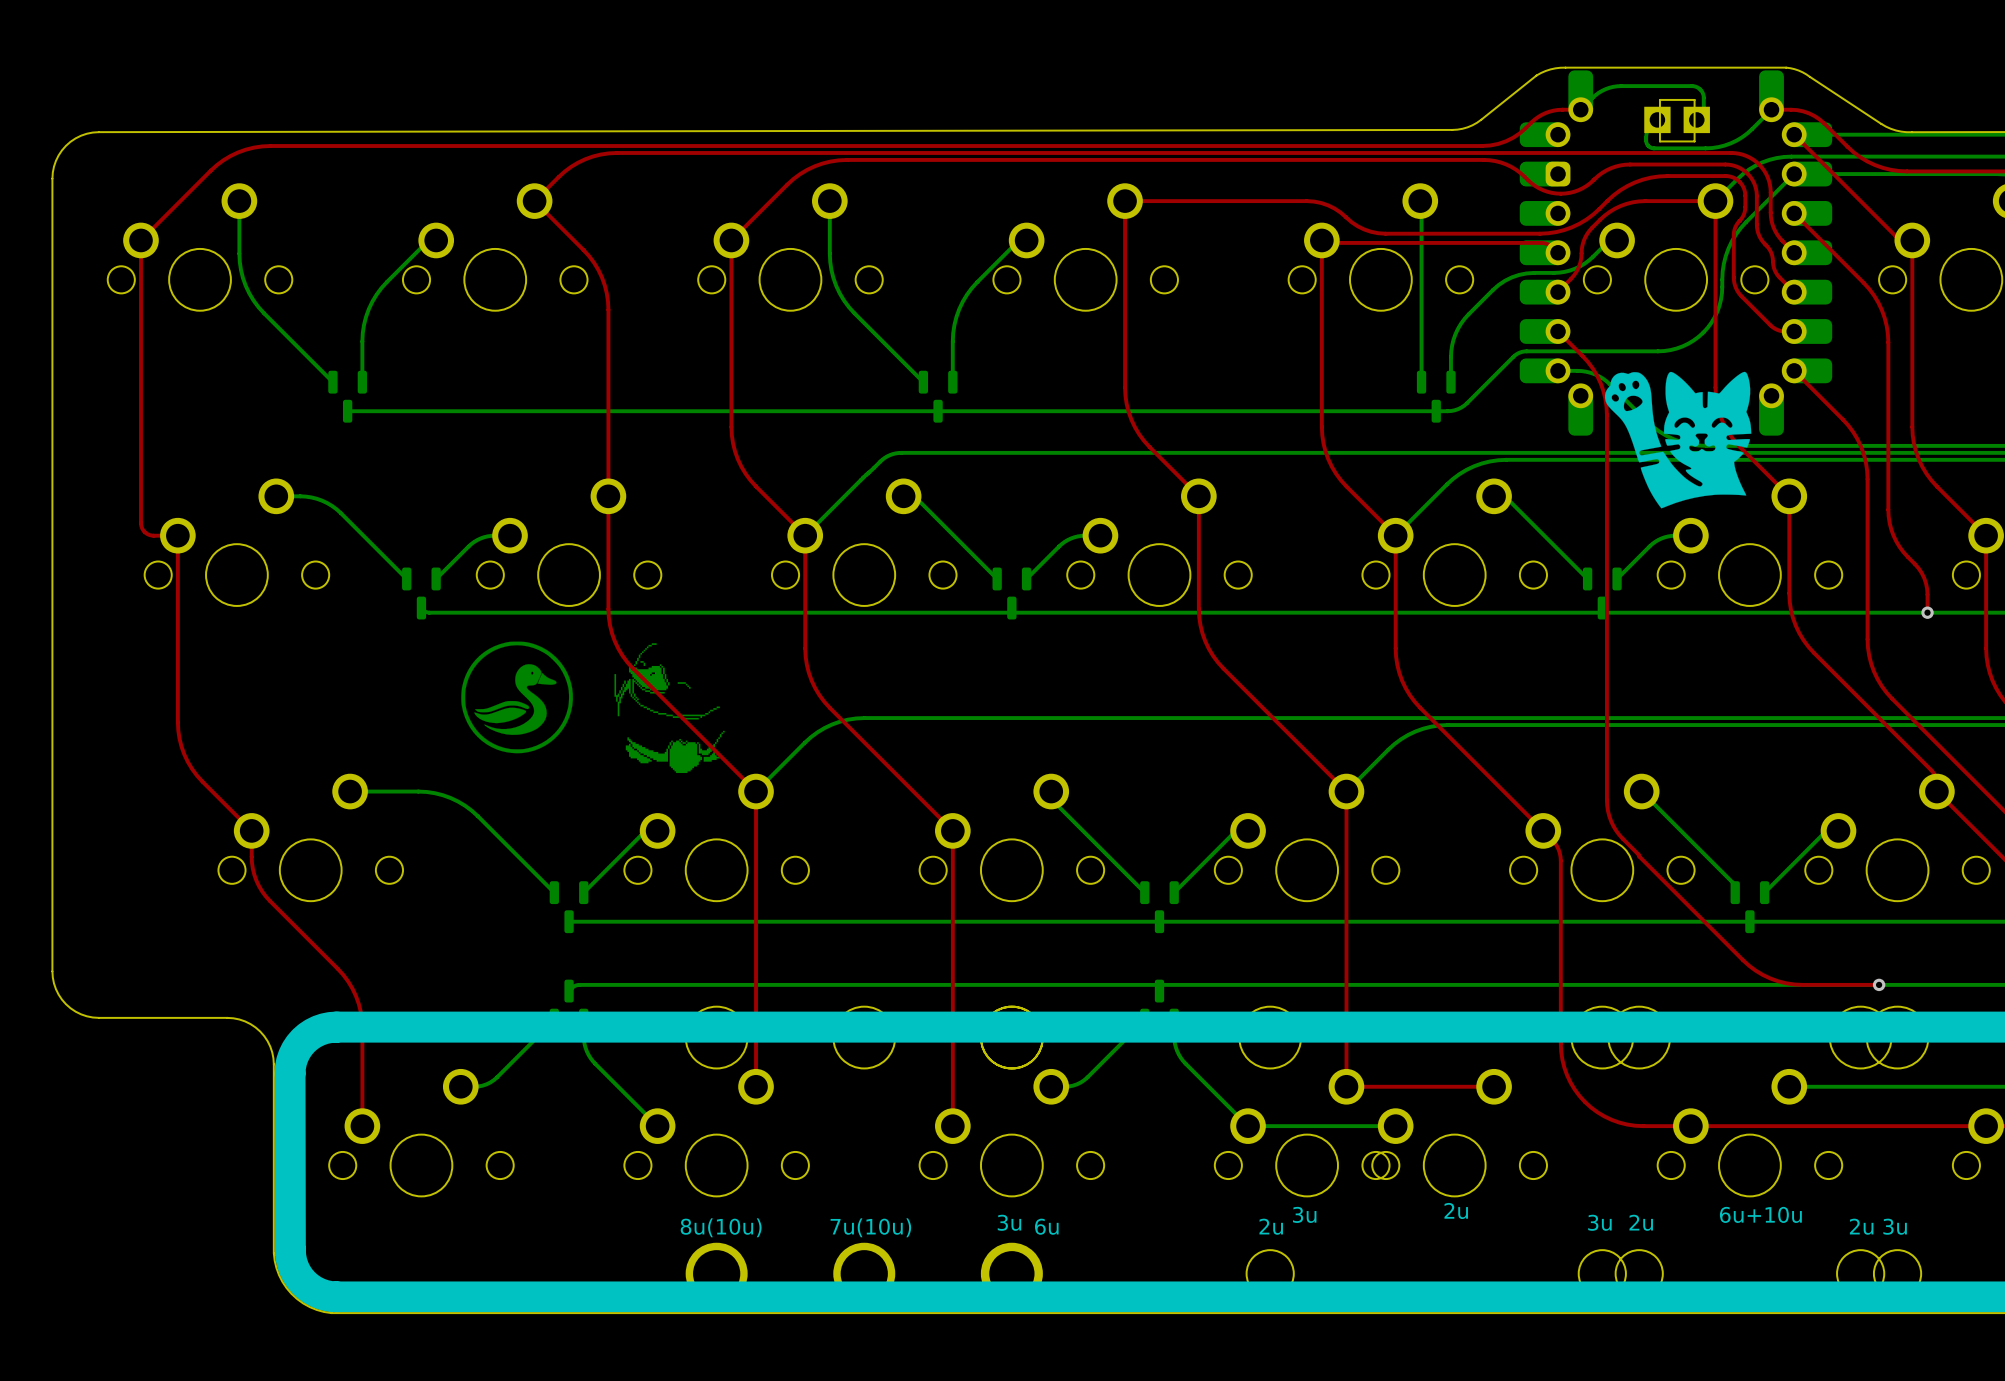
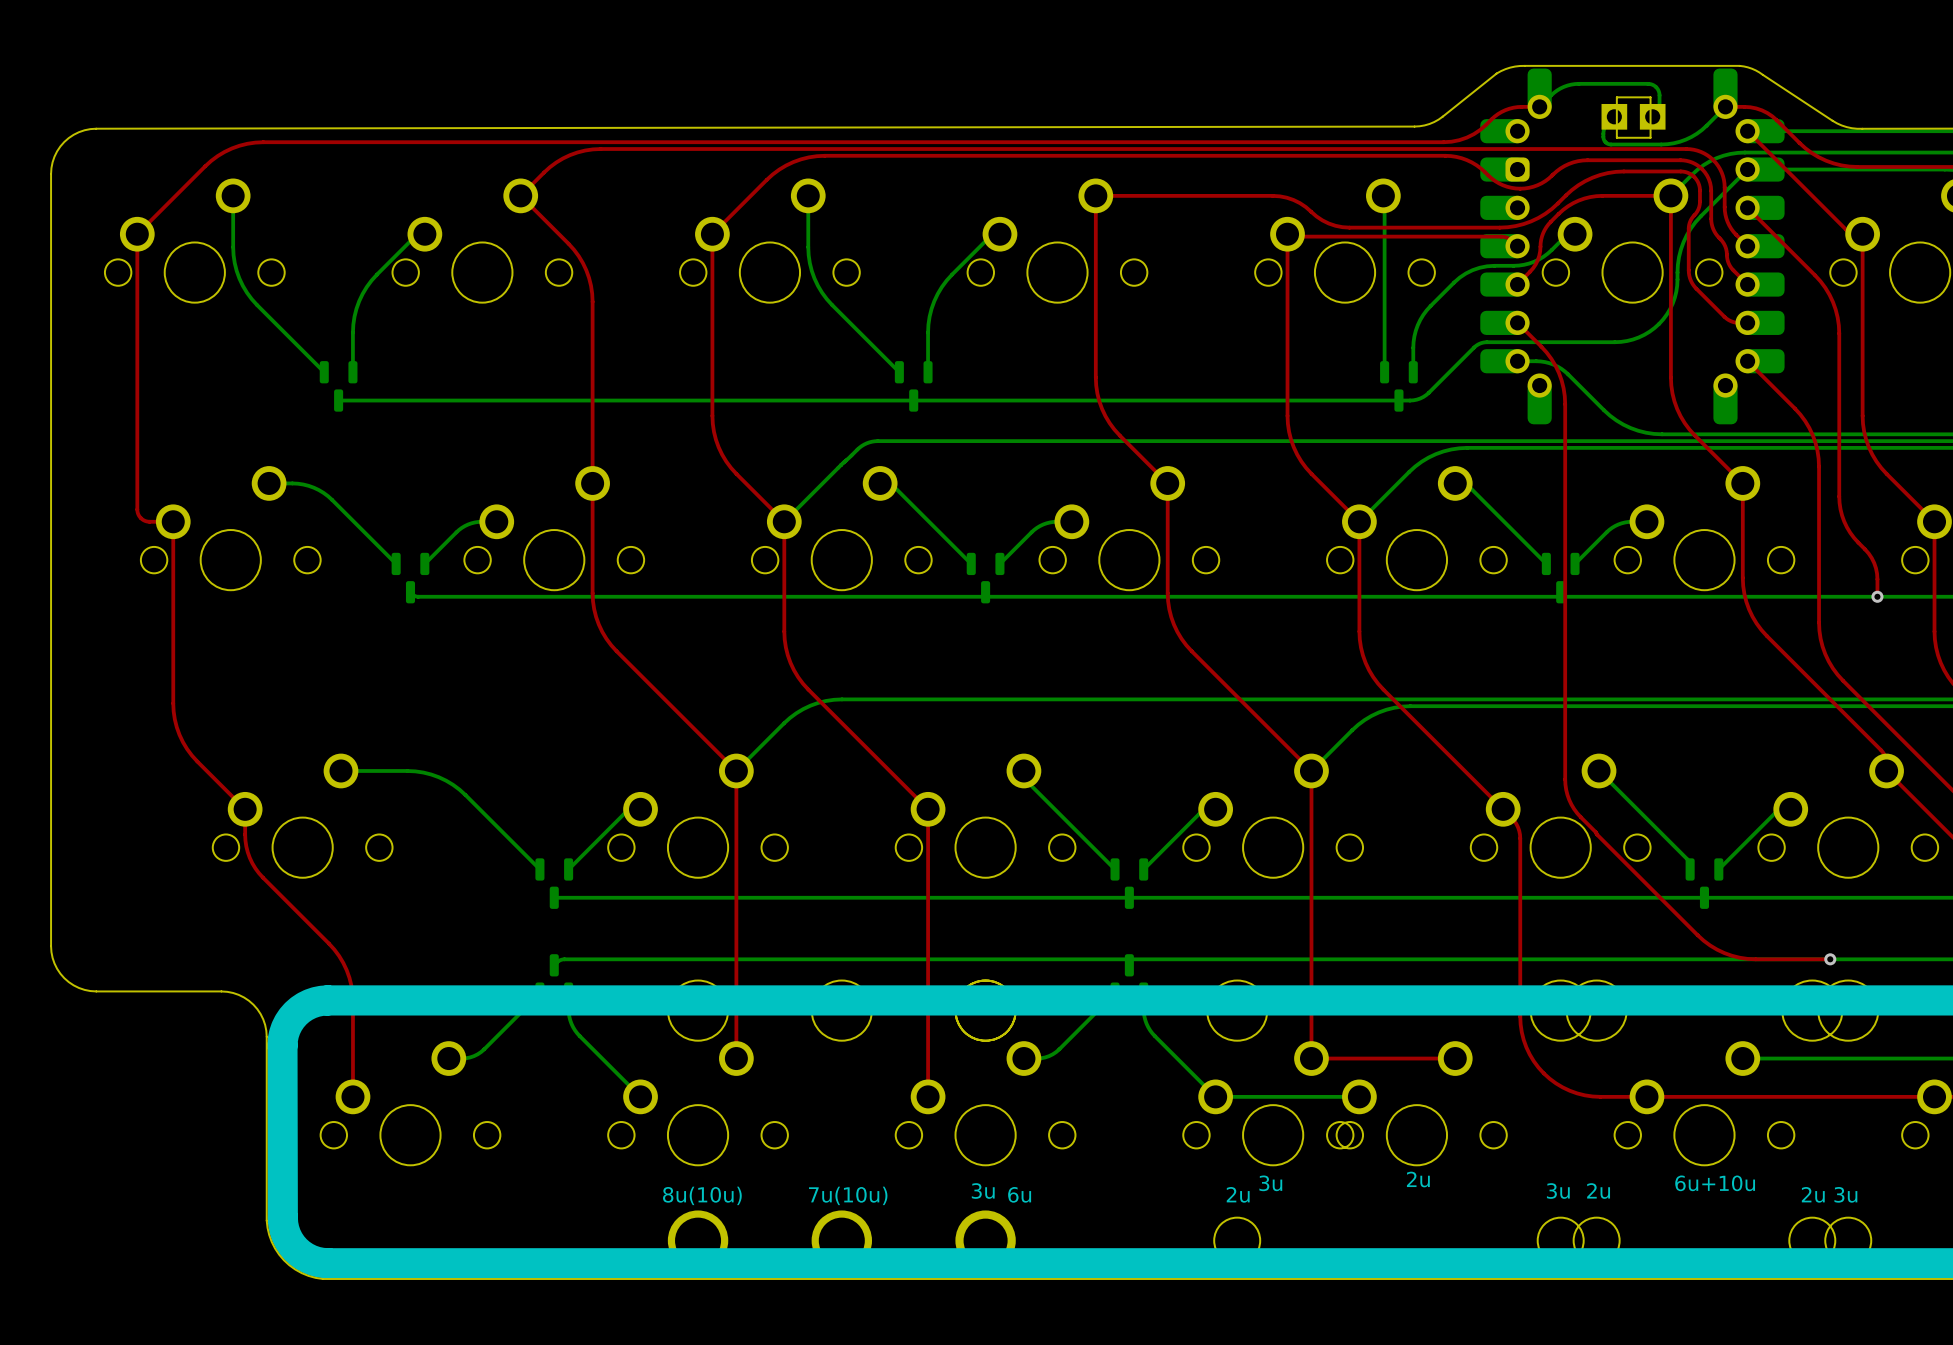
drawing: [1604, 371, 1752, 509] -> none
drawing: [461, 641, 573, 754] -> none
drawing: [614, 643, 725, 774] -> none

